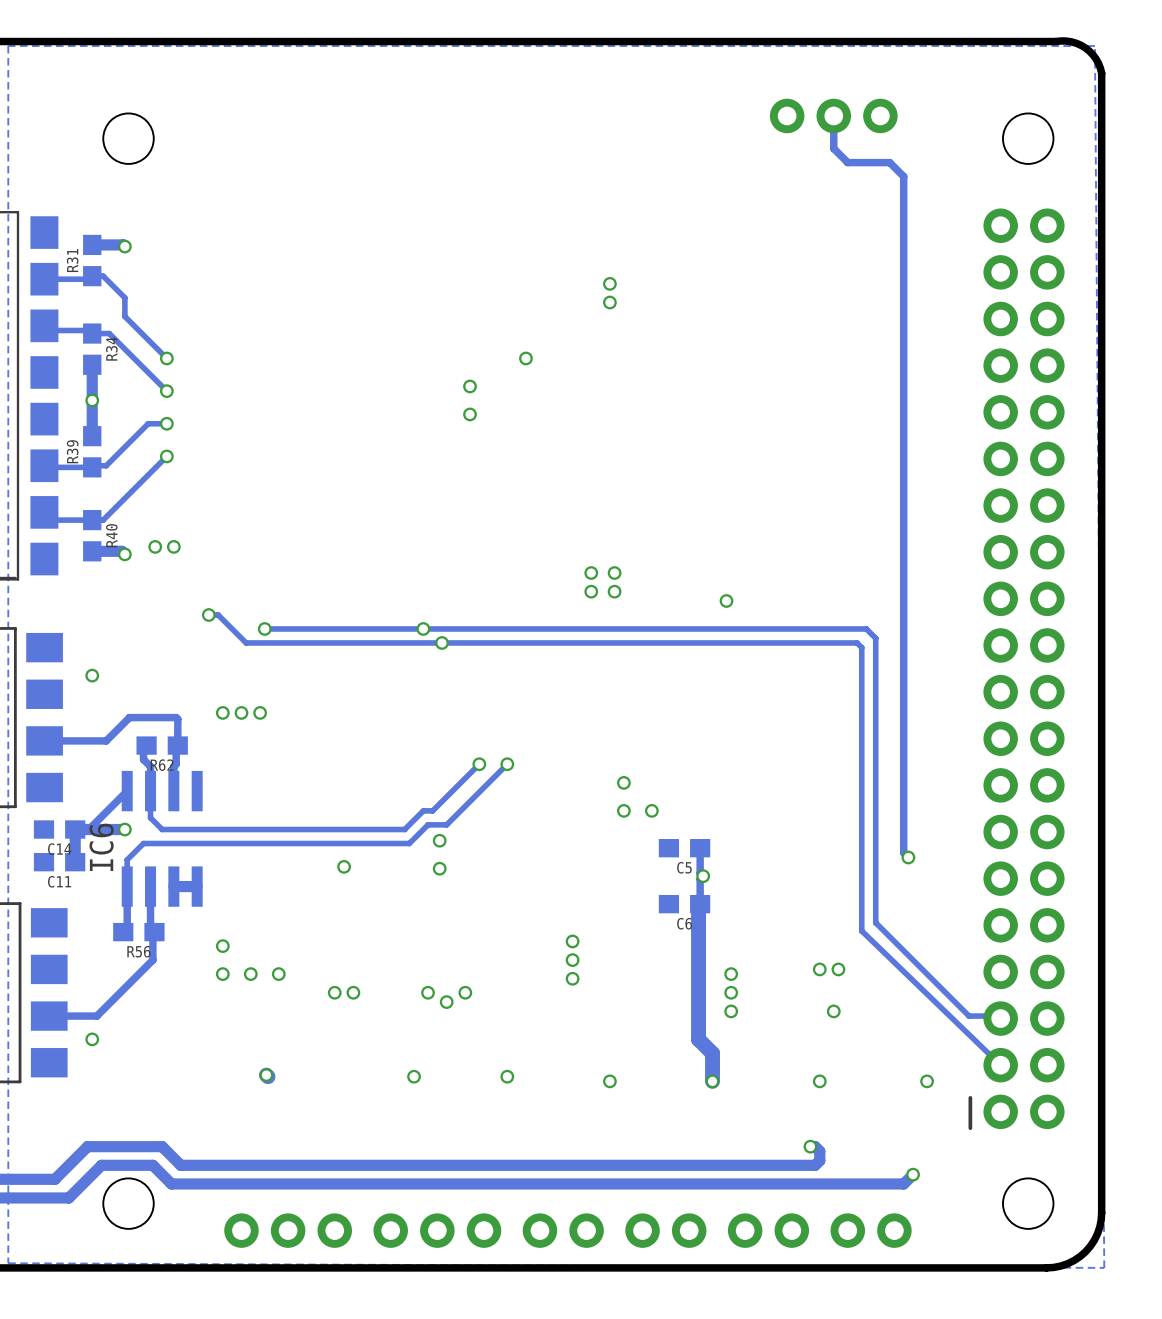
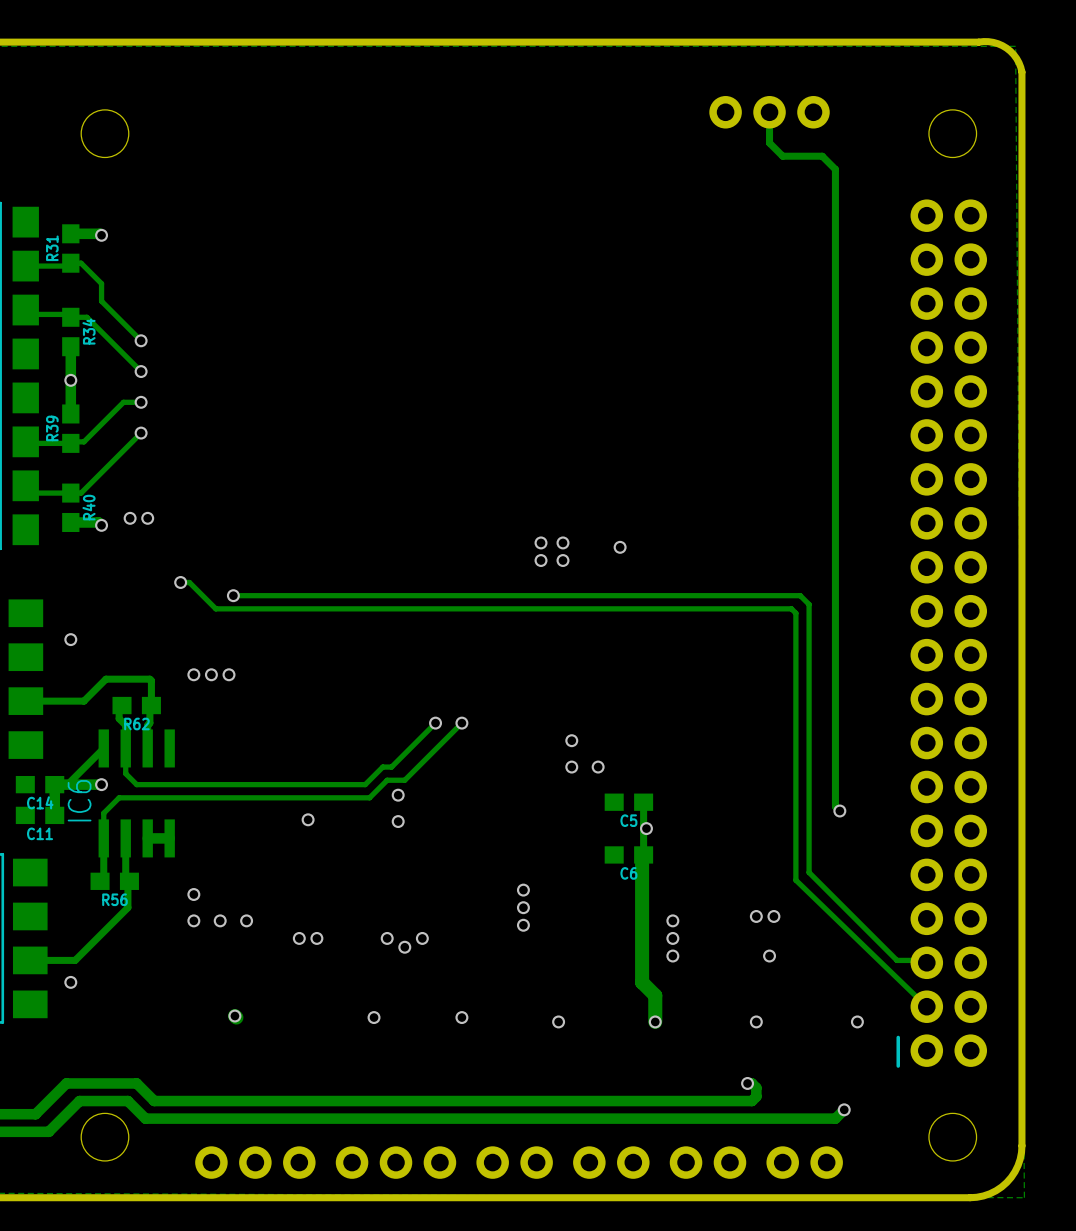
via: (609, 283) -> none
via: (609, 302) -> none
via: (525, 358) -> none
via: (470, 386) -> none
via: (470, 414) -> none
via position: (726, 601) -> (620, 547)
via: (423, 628) -> none
via: (442, 642) -> none

